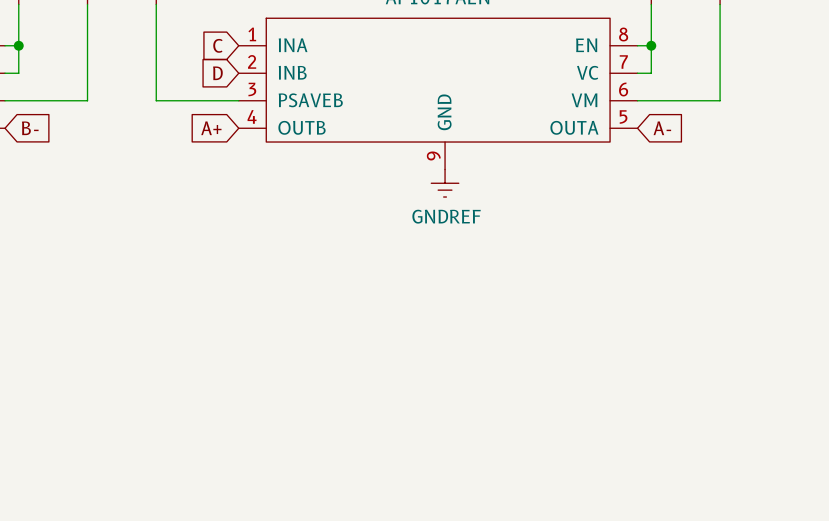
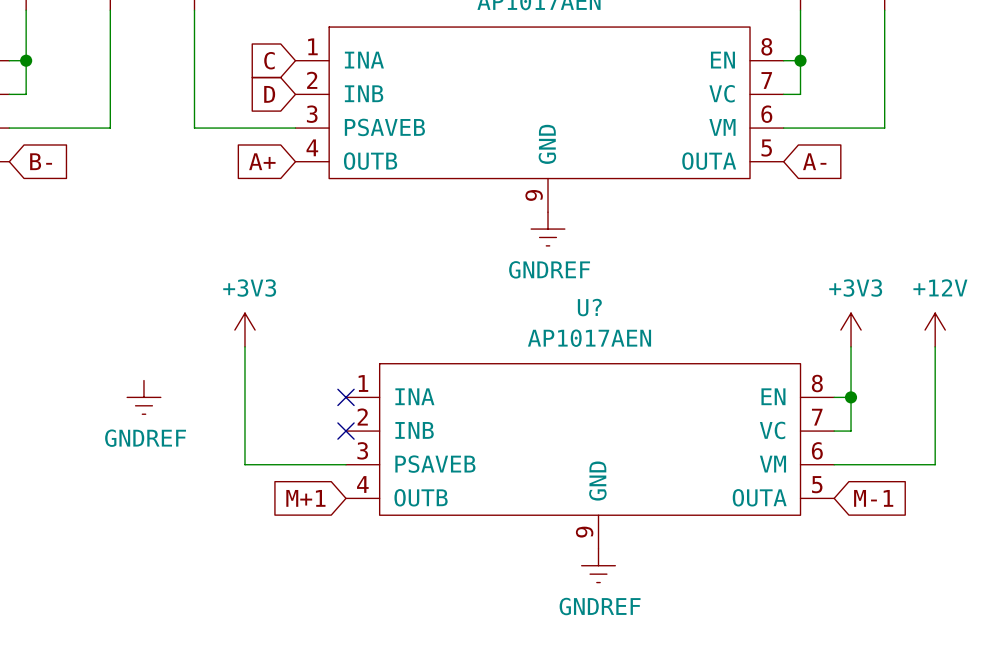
power symbol: none -> +3V3 (244, 330)
power symbol: none -> +3V3 (851, 330)
power symbol: none -> +12V (935, 330)
wire: none -> (244, 346) (244, 464) (345, 464)
wire: none -> (851, 346) (851, 431) (834, 431)
wire: none -> (935, 346) (935, 464) (834, 464)
power symbol: none -> GNDREF (143, 397)
no-connect mark: none -> (345, 397)
wire: none -> (834, 397) (851, 397)
junction: none -> (851, 397)
no-connect mark: none -> (345, 431)
U?: none -> AP1017AEN (590, 456)
global label: none -> M+1 (305, 498)
global label: none -> M-1 (873, 498)
power symbol: none -> GNDREF (598, 565)

